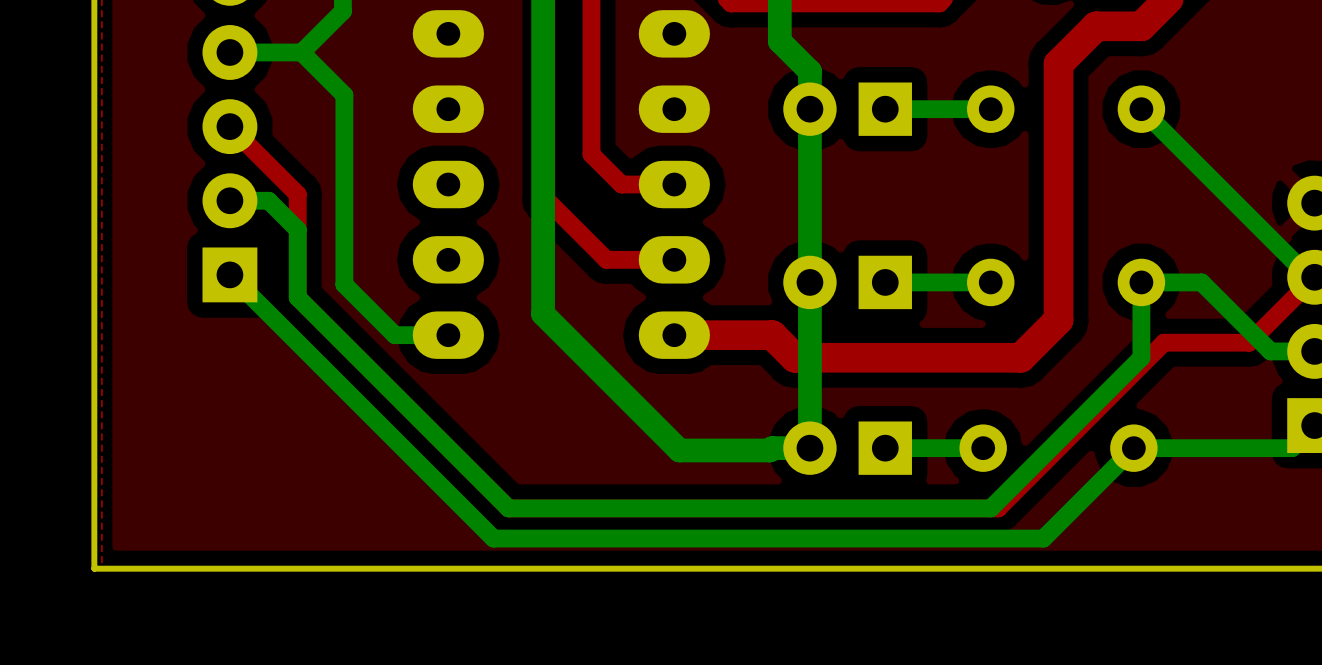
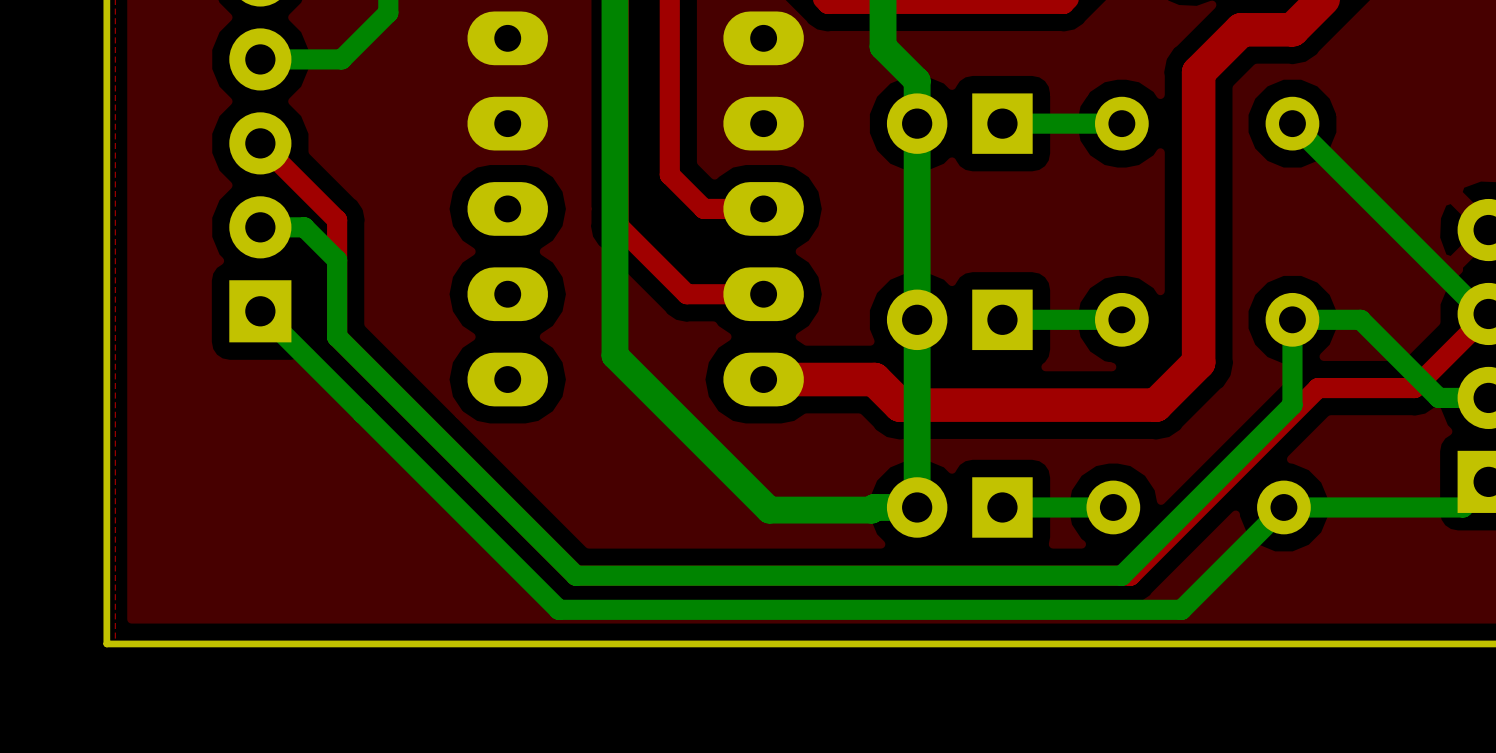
bottom track: (301, 52) (344, 95) (344, 284) (395, 335) (448, 335) -> none

